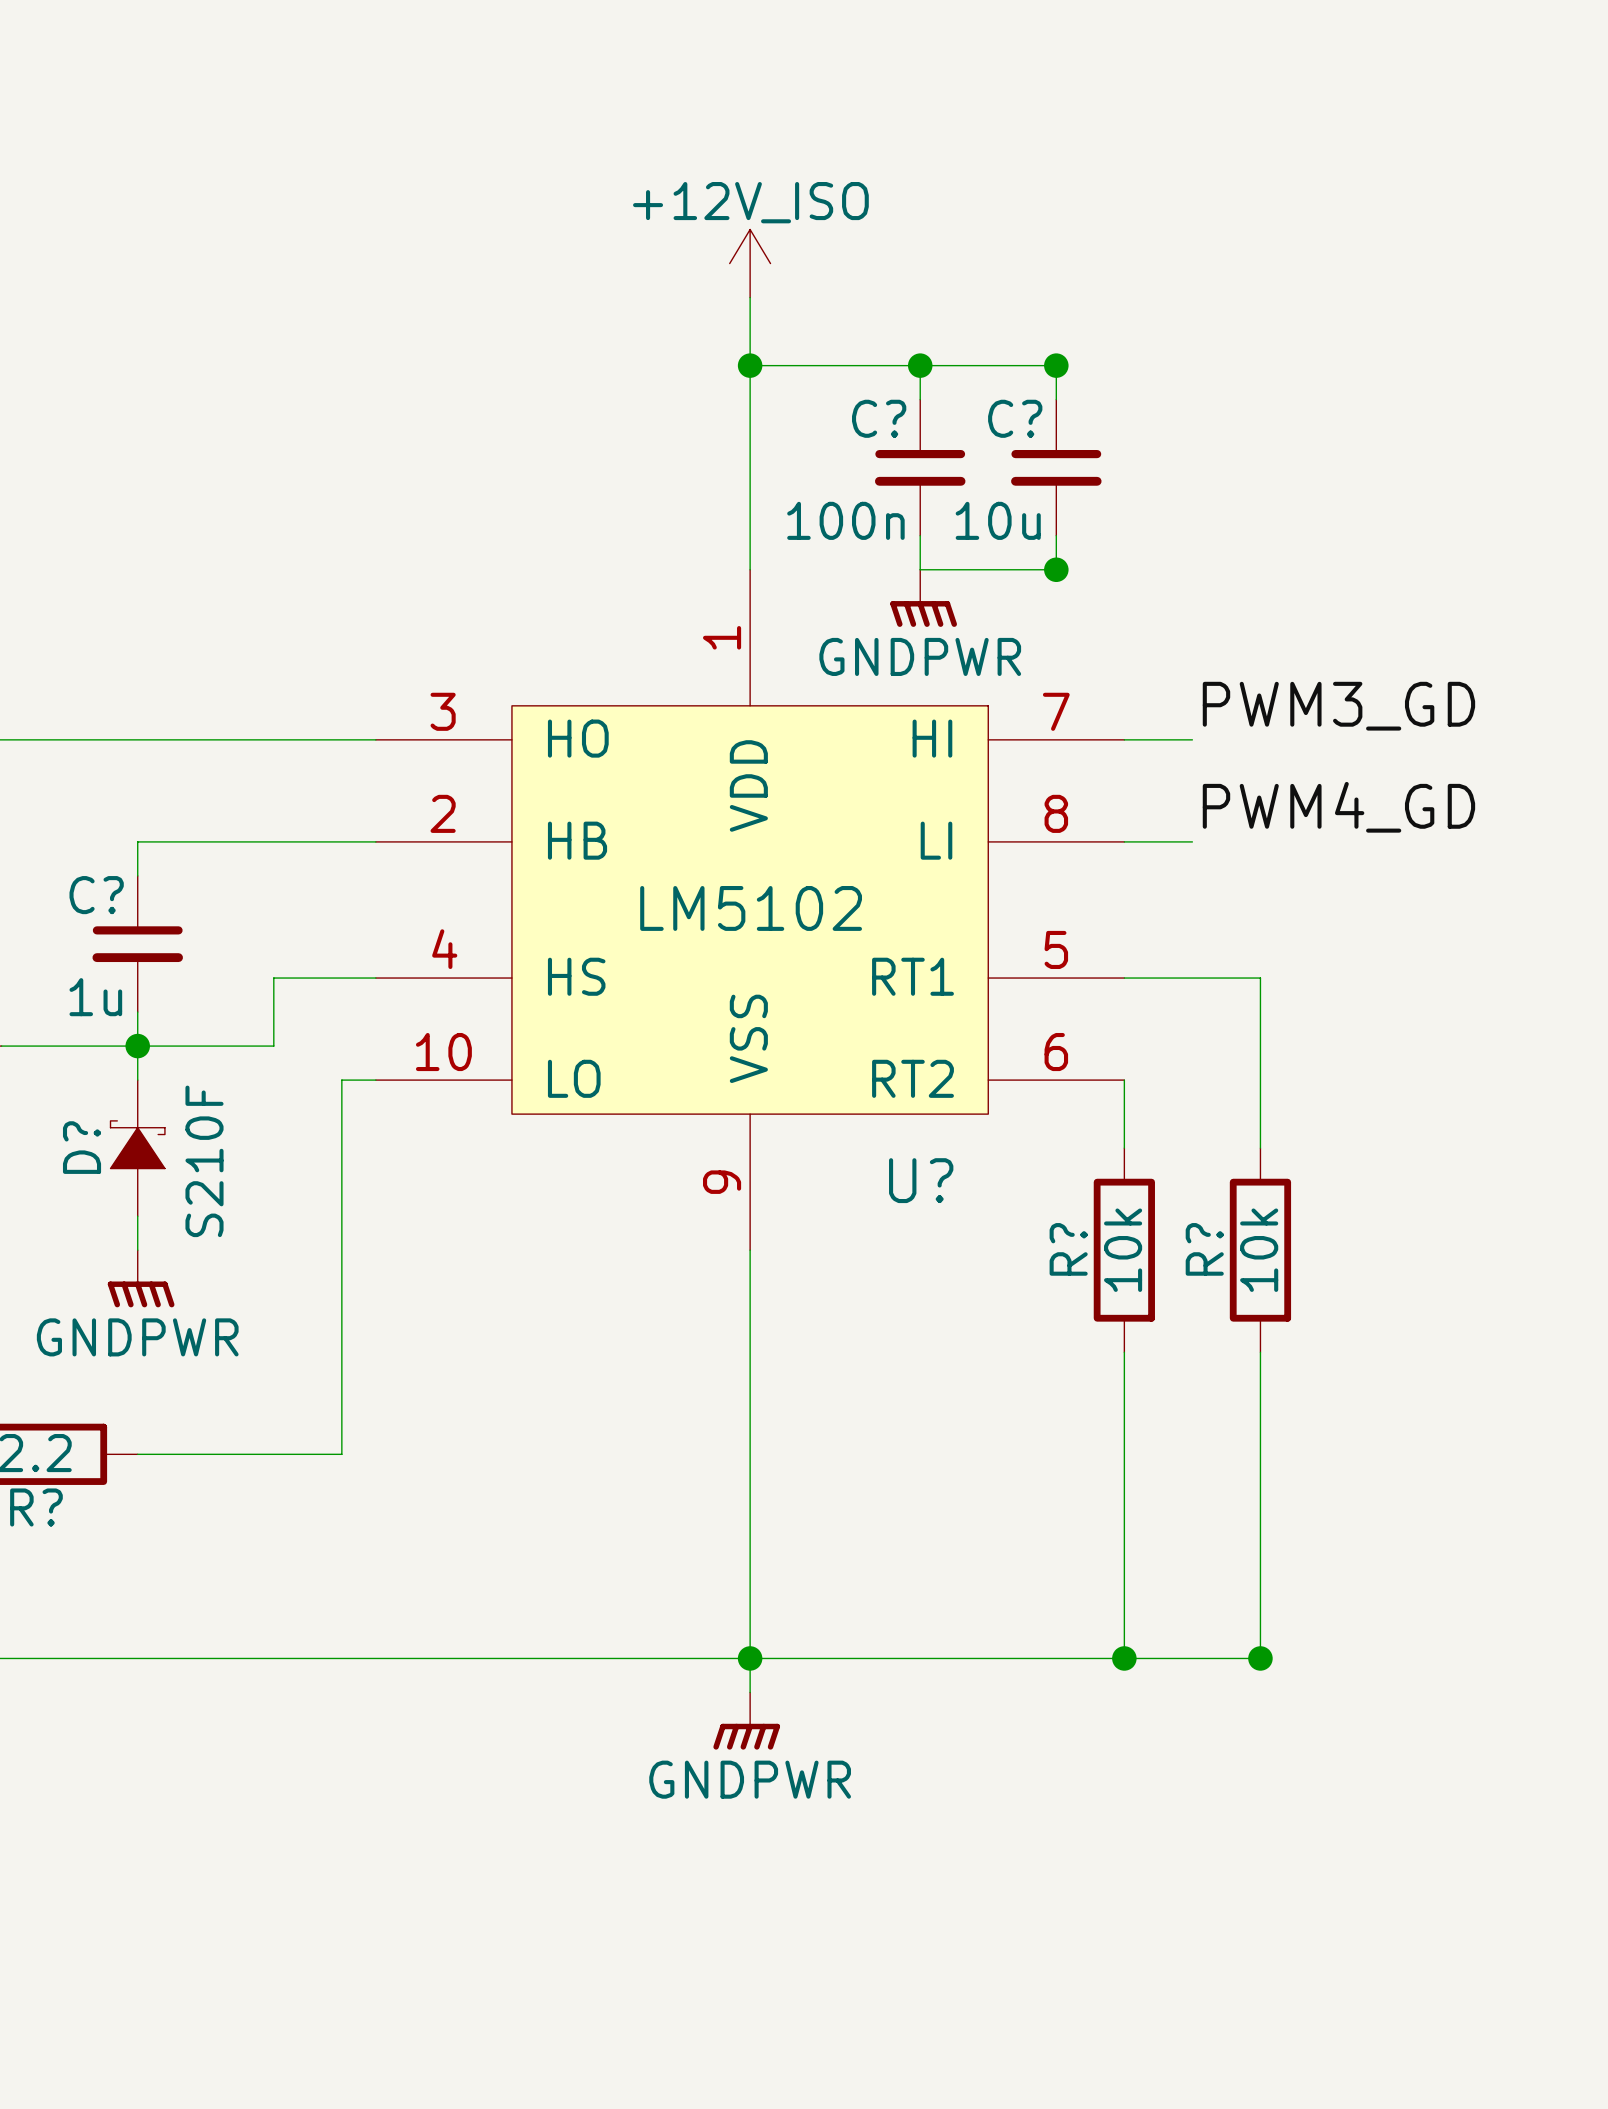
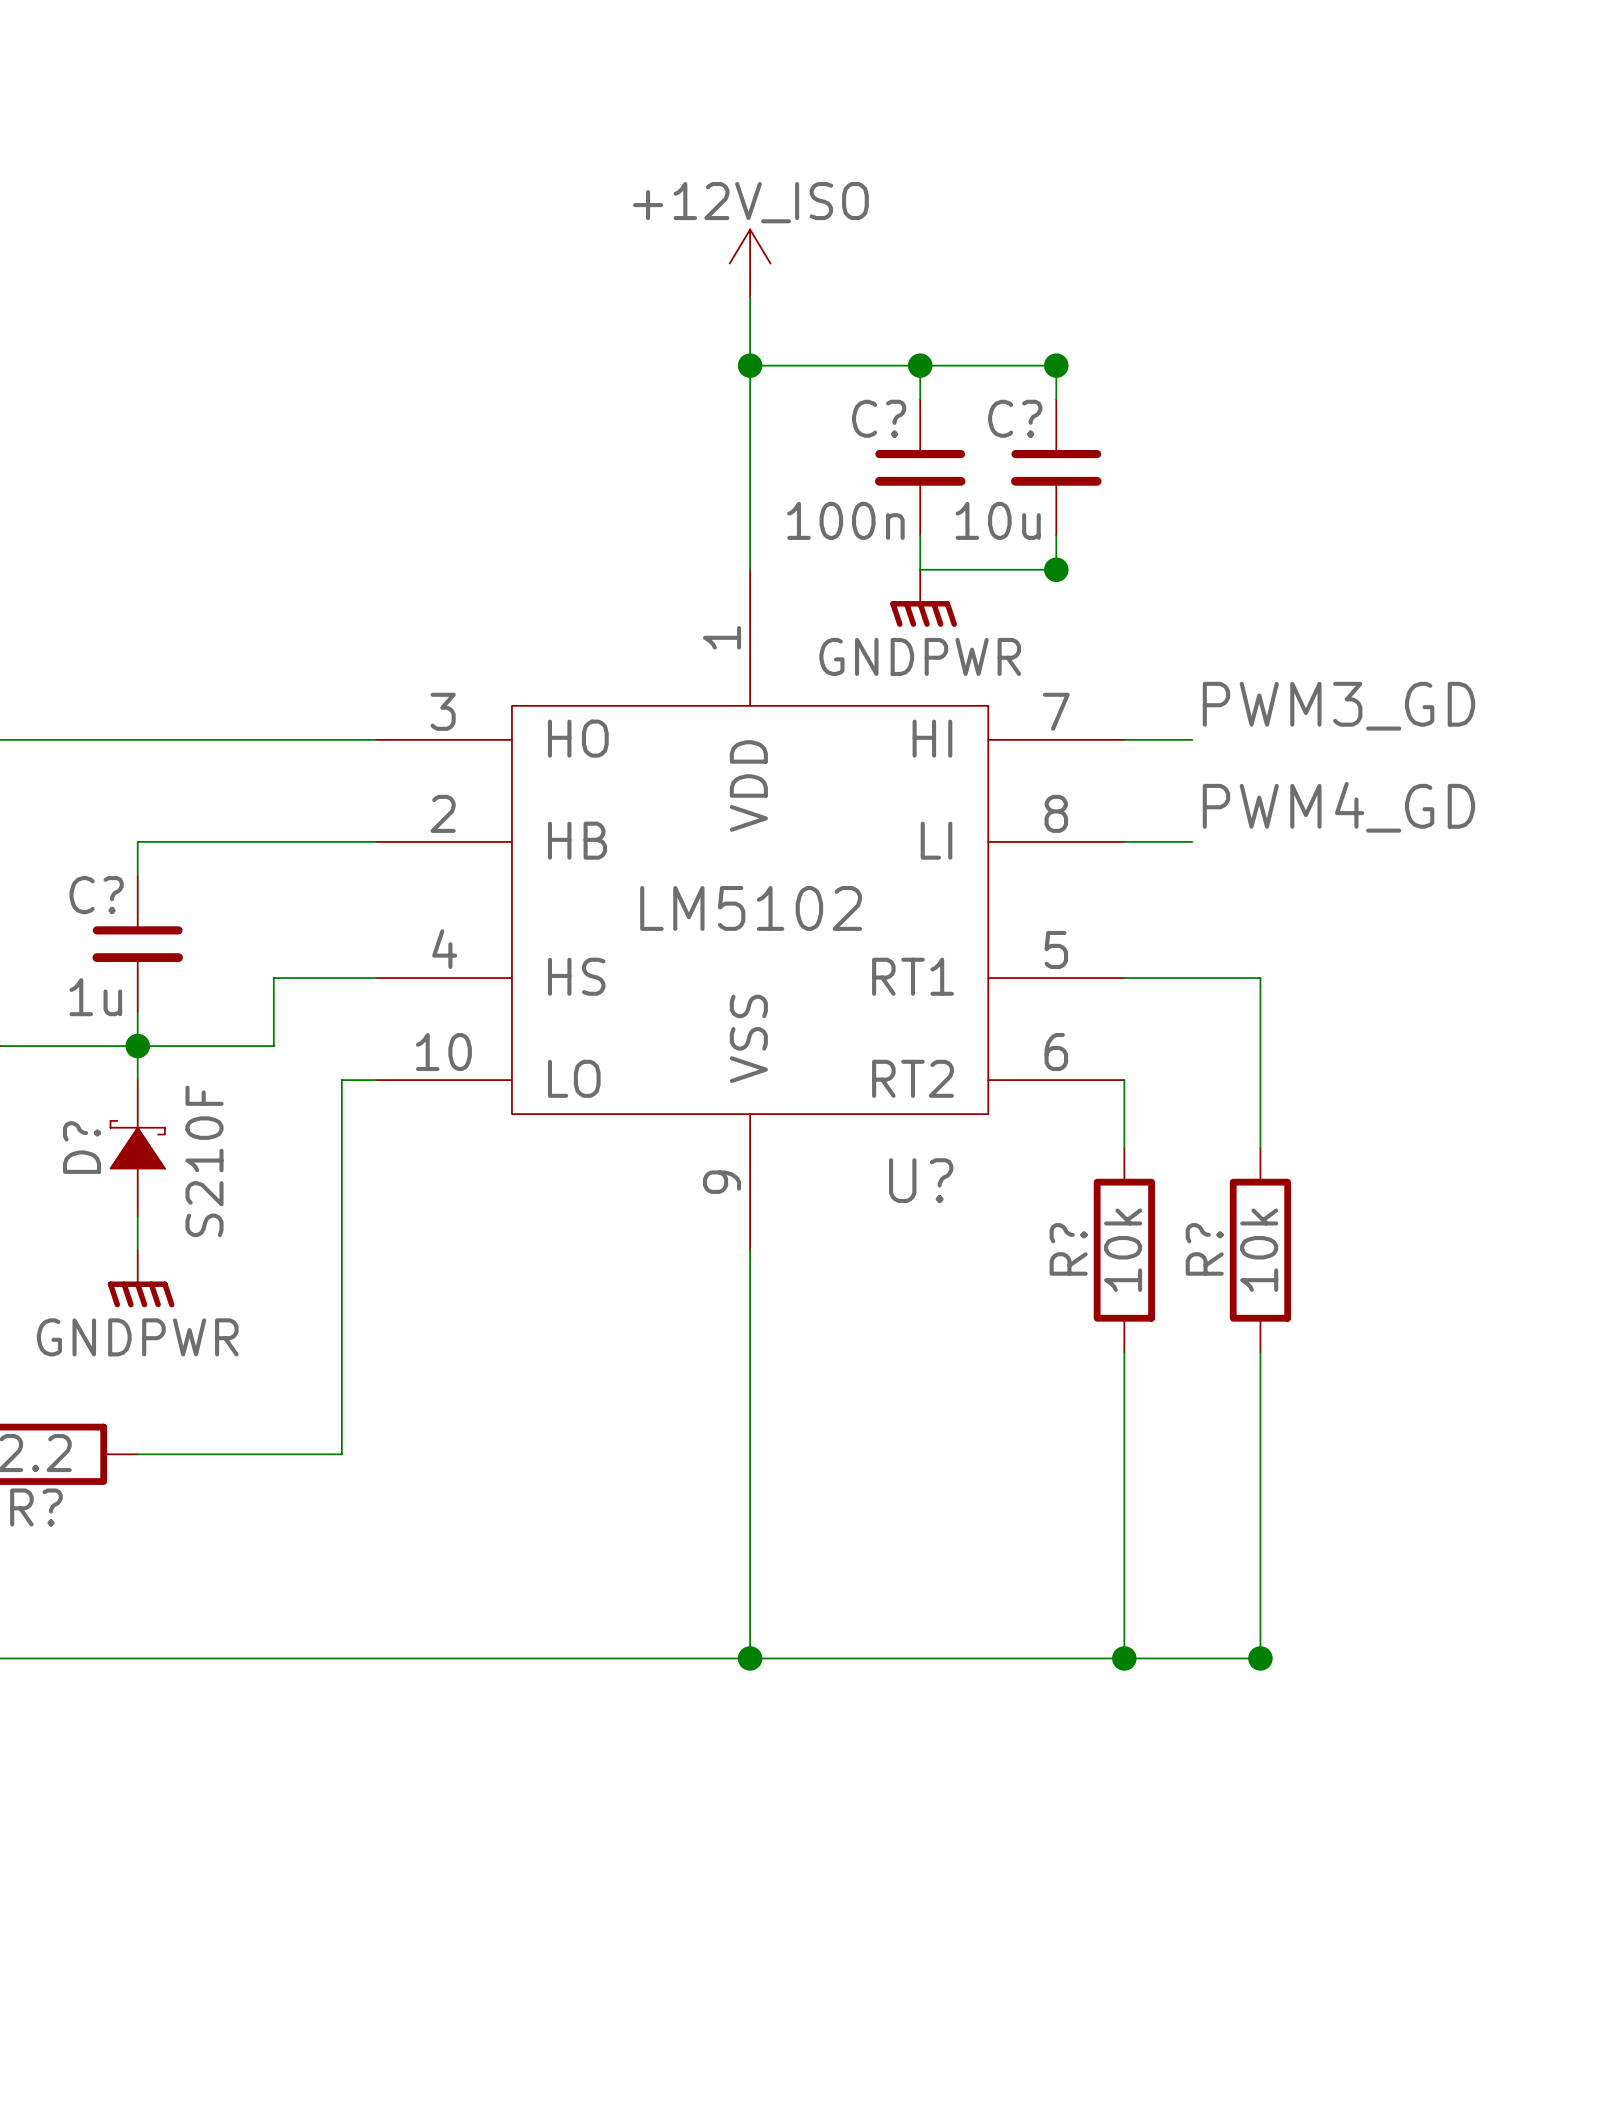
wire: (750, 1658) (750, 1692) -> none
power symbol: GNDPWR (746, 1721) -> none

